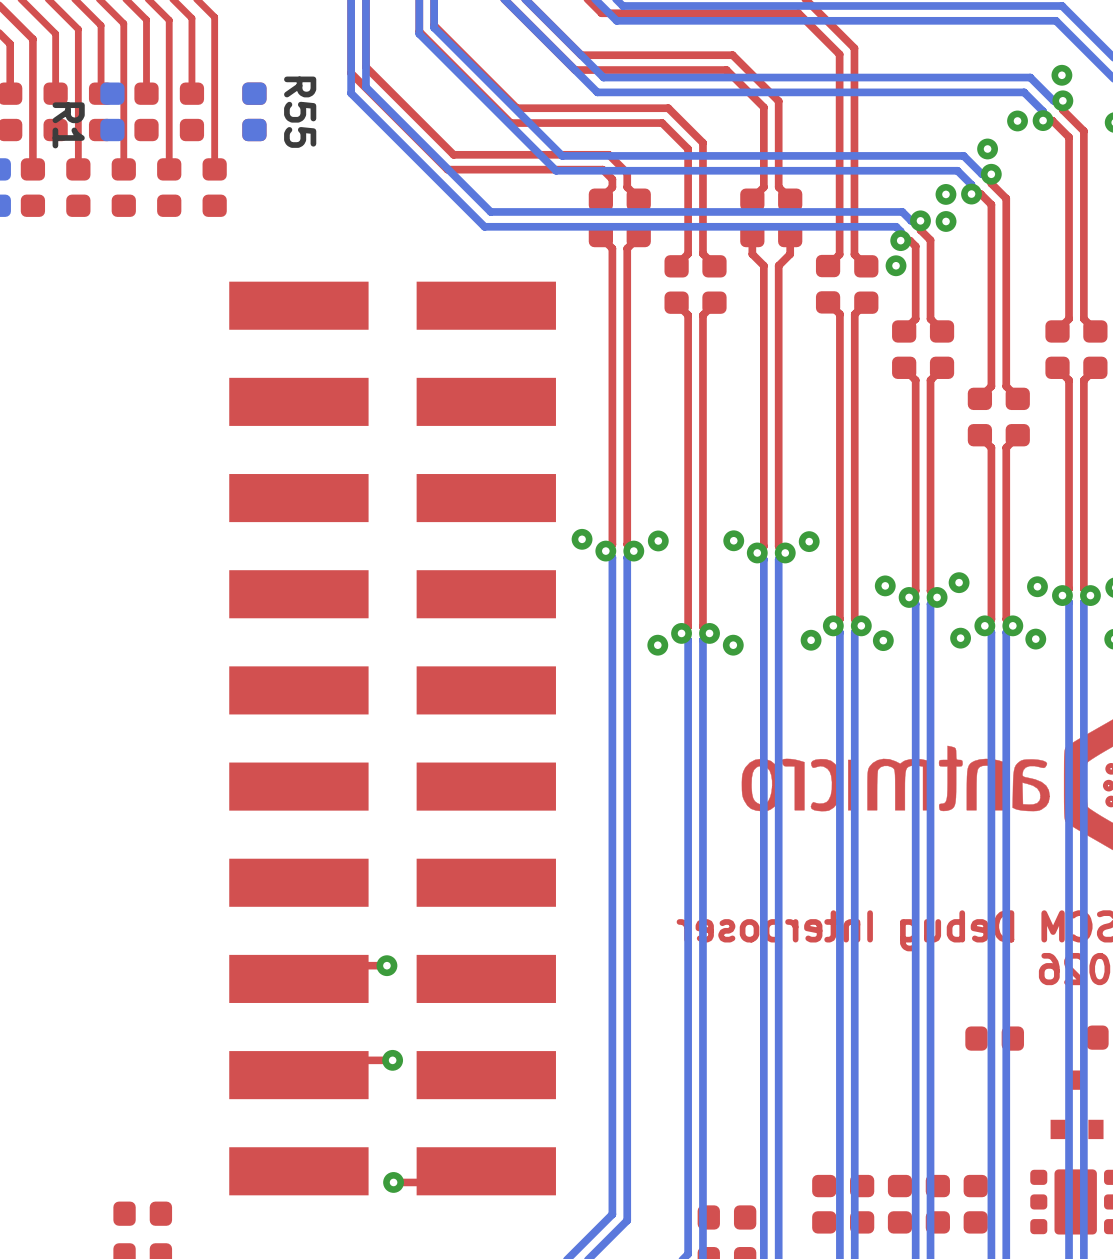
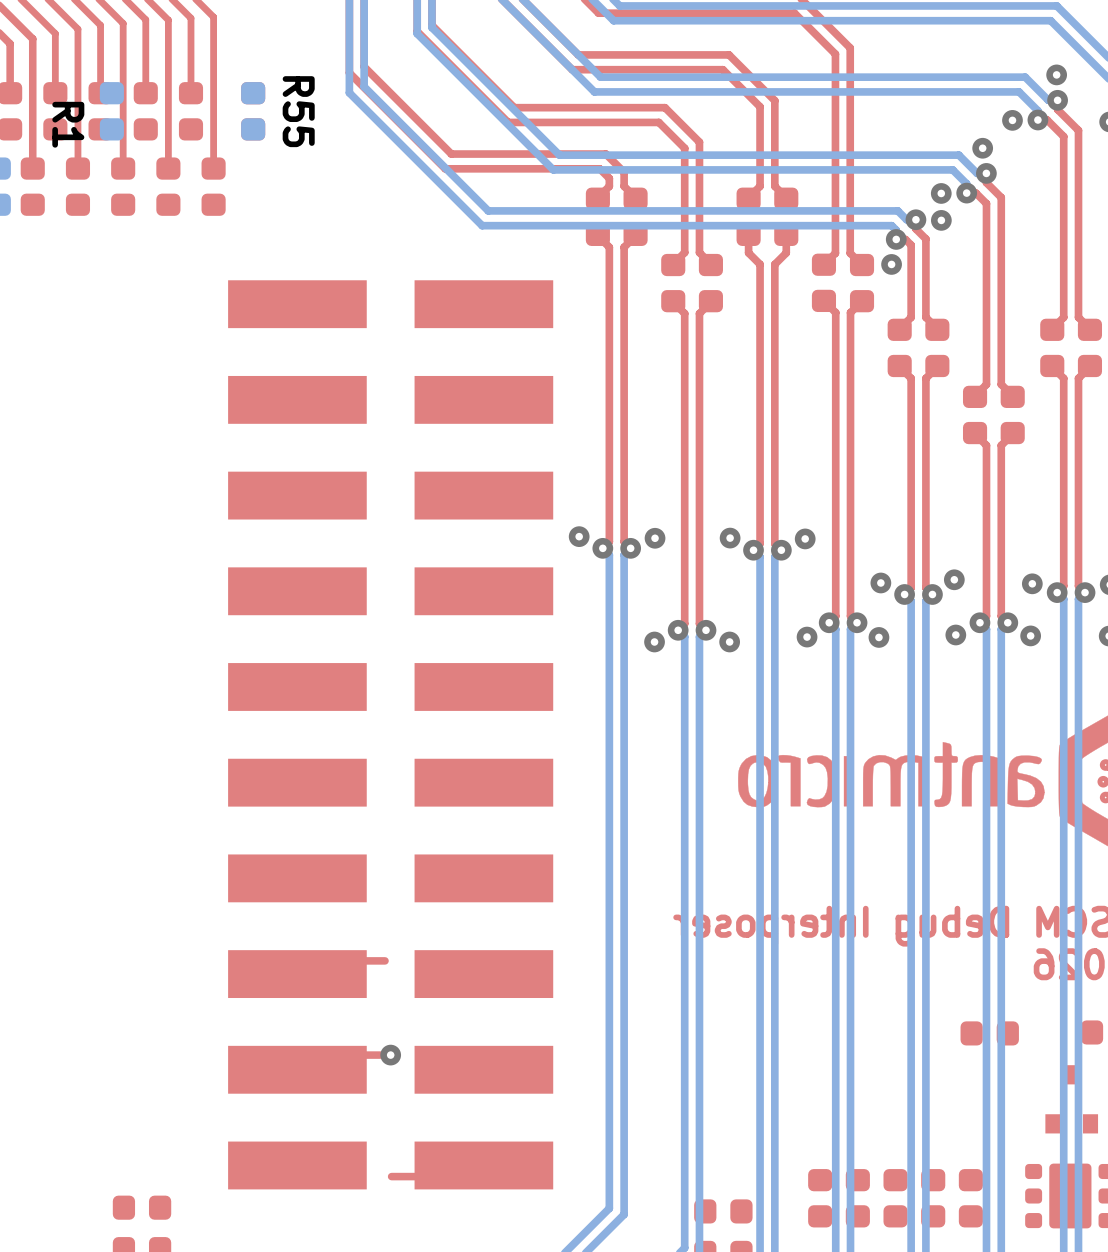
via: (386, 965) -> none
via: (393, 1182) -> none

